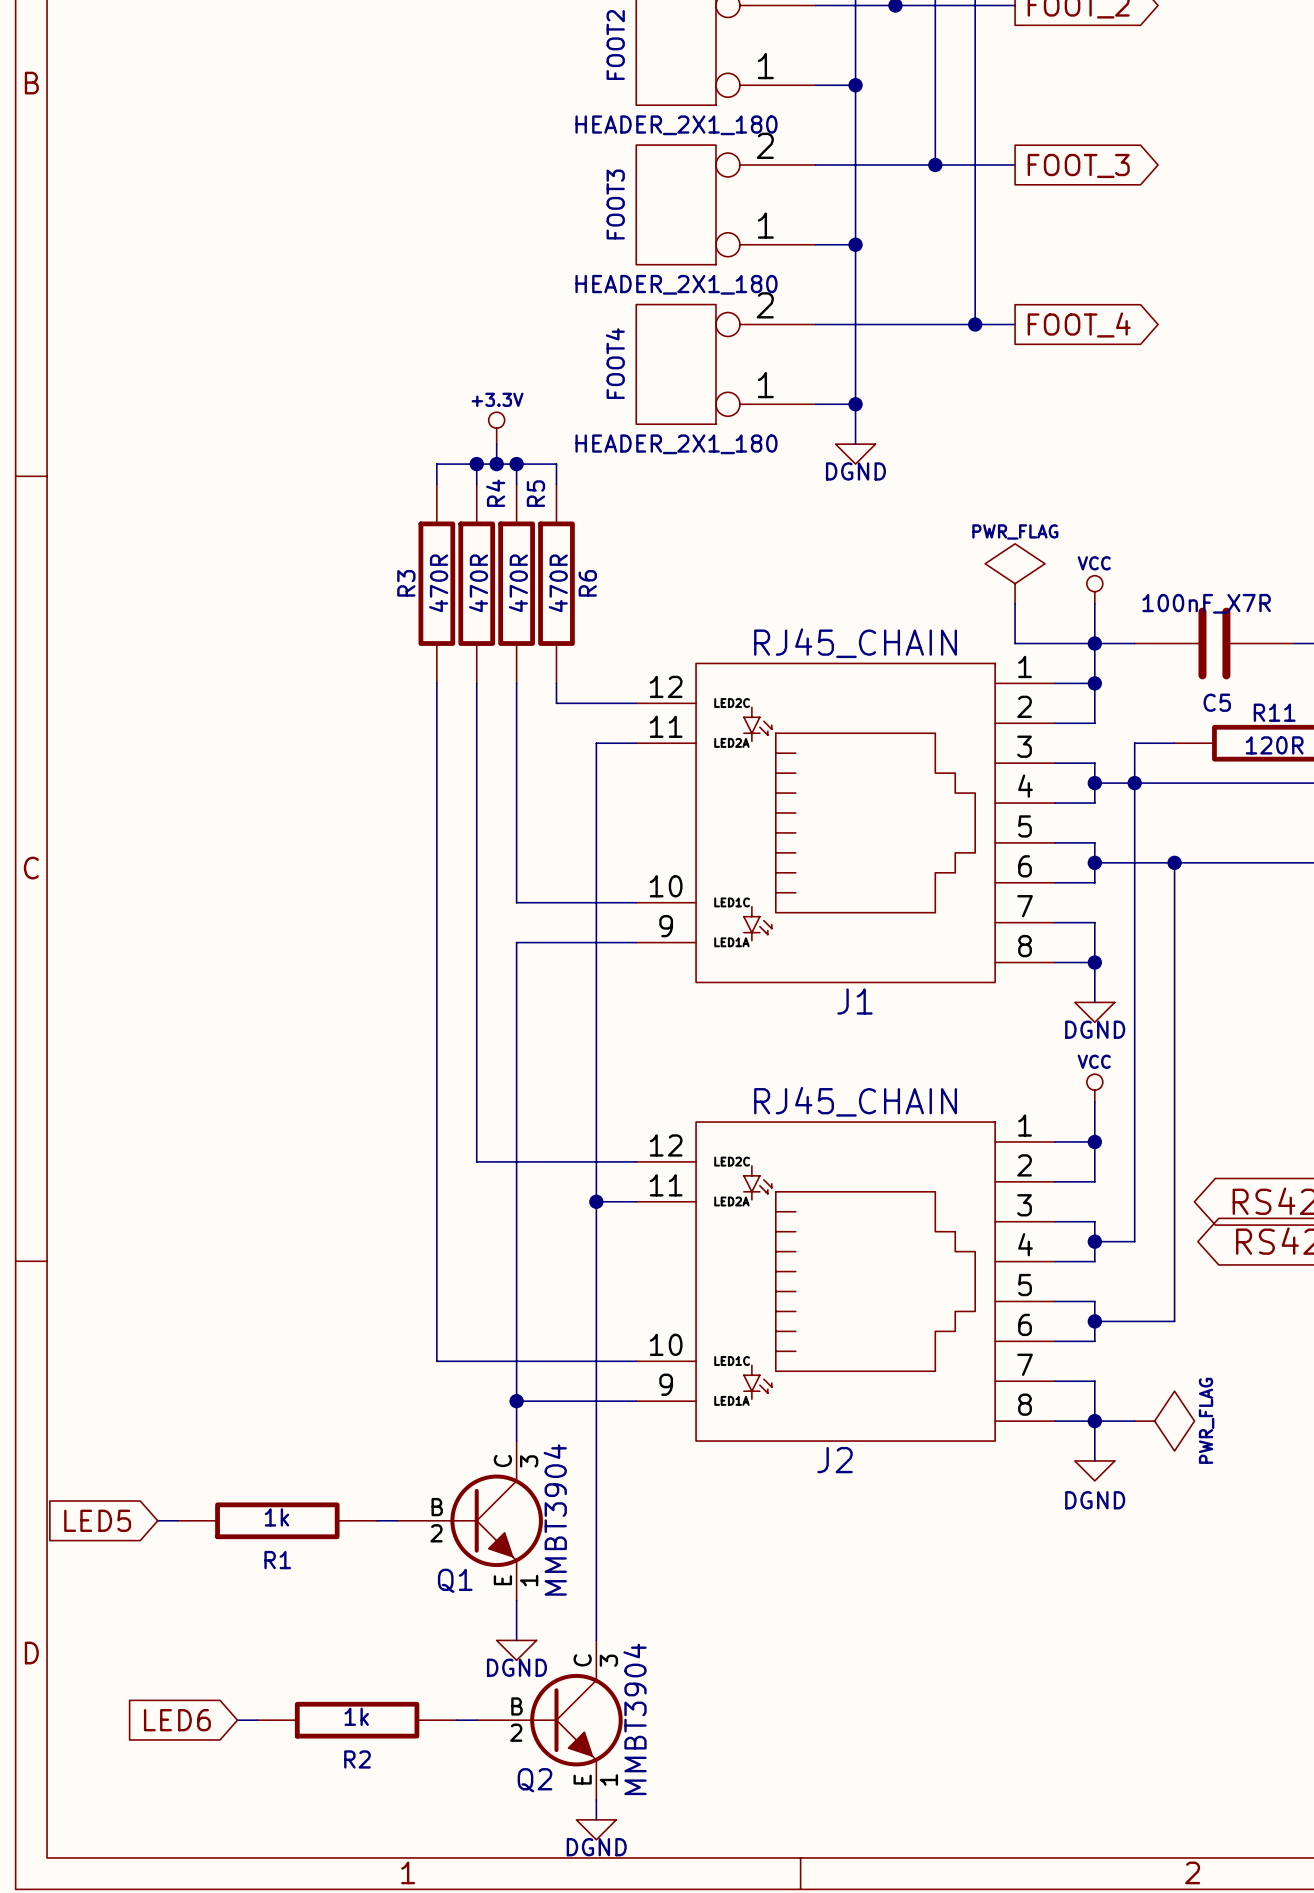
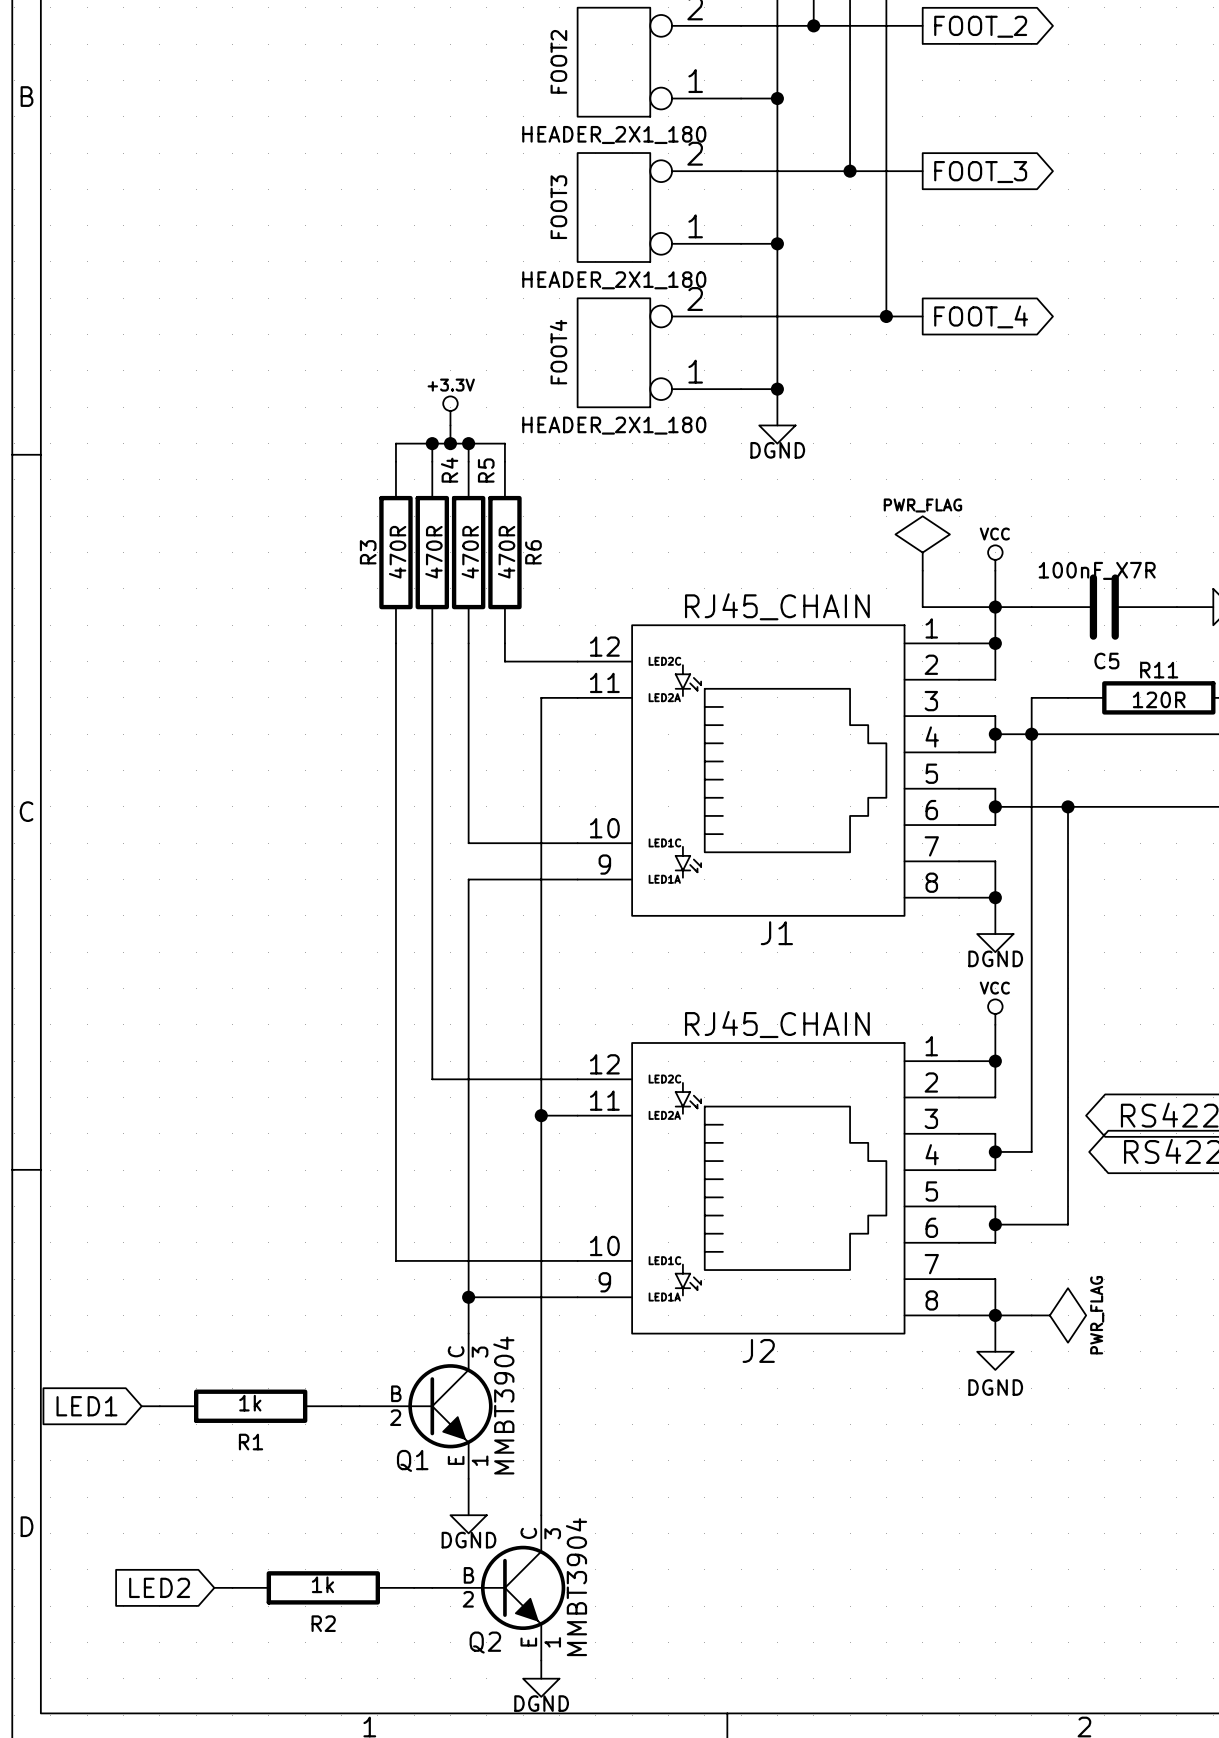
global label: LED5 (97, 1520) -> LED1 (86, 1406)
global label: LED6 (177, 1720) -> LED2 (159, 1587)

